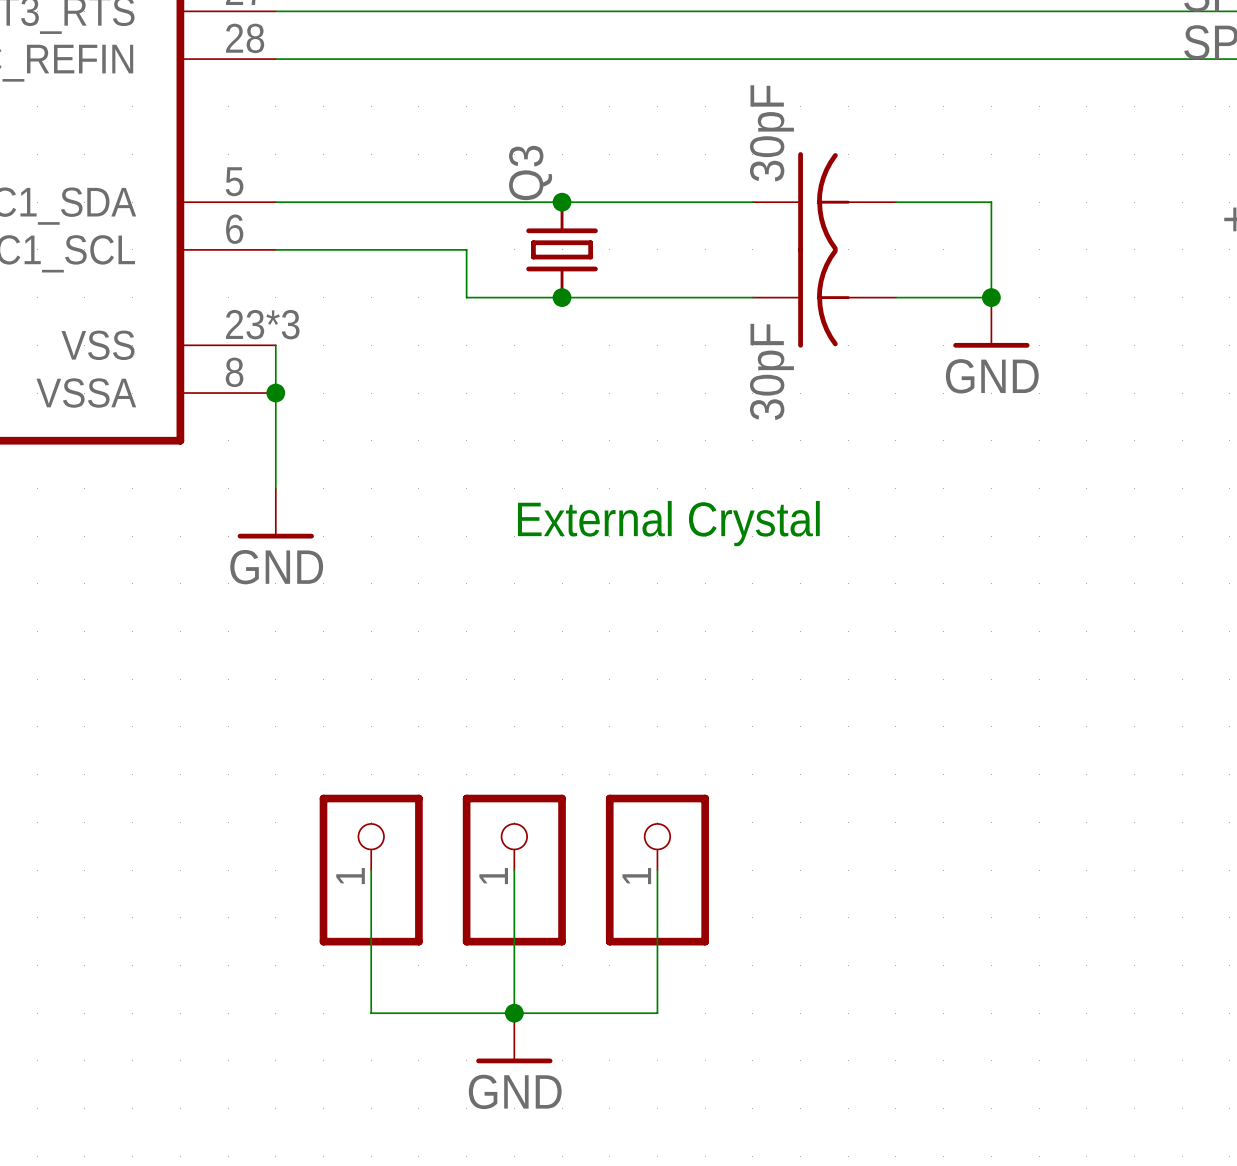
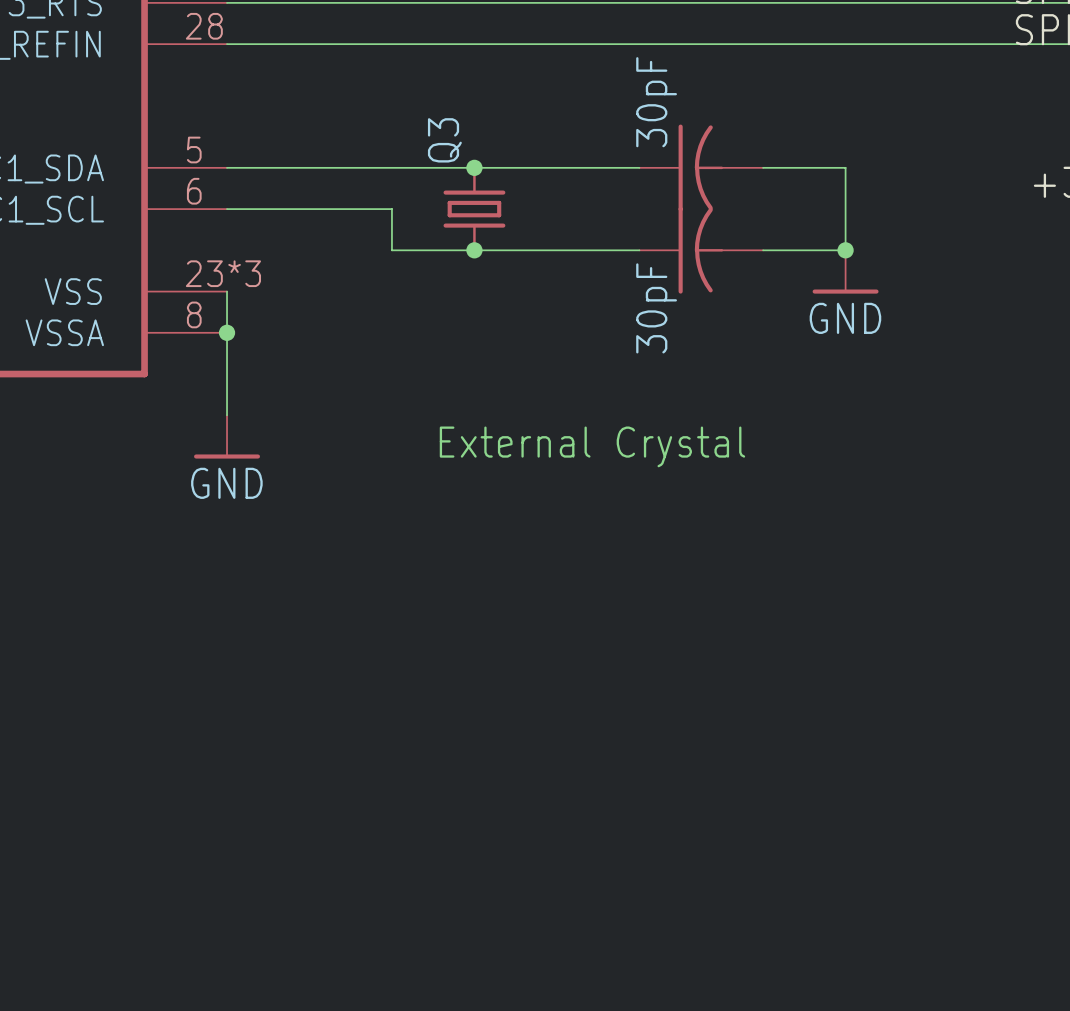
wire: (371, 870) (371, 1013) (657, 1013) (657, 870) -> none
part: (371, 870) -> none
wire: (514, 870) (514, 1013) -> none
part: (514, 870) -> none
part: (657, 870) -> none
junction: (514, 1013) -> none
power symbol: GND (514, 1038) -> none

